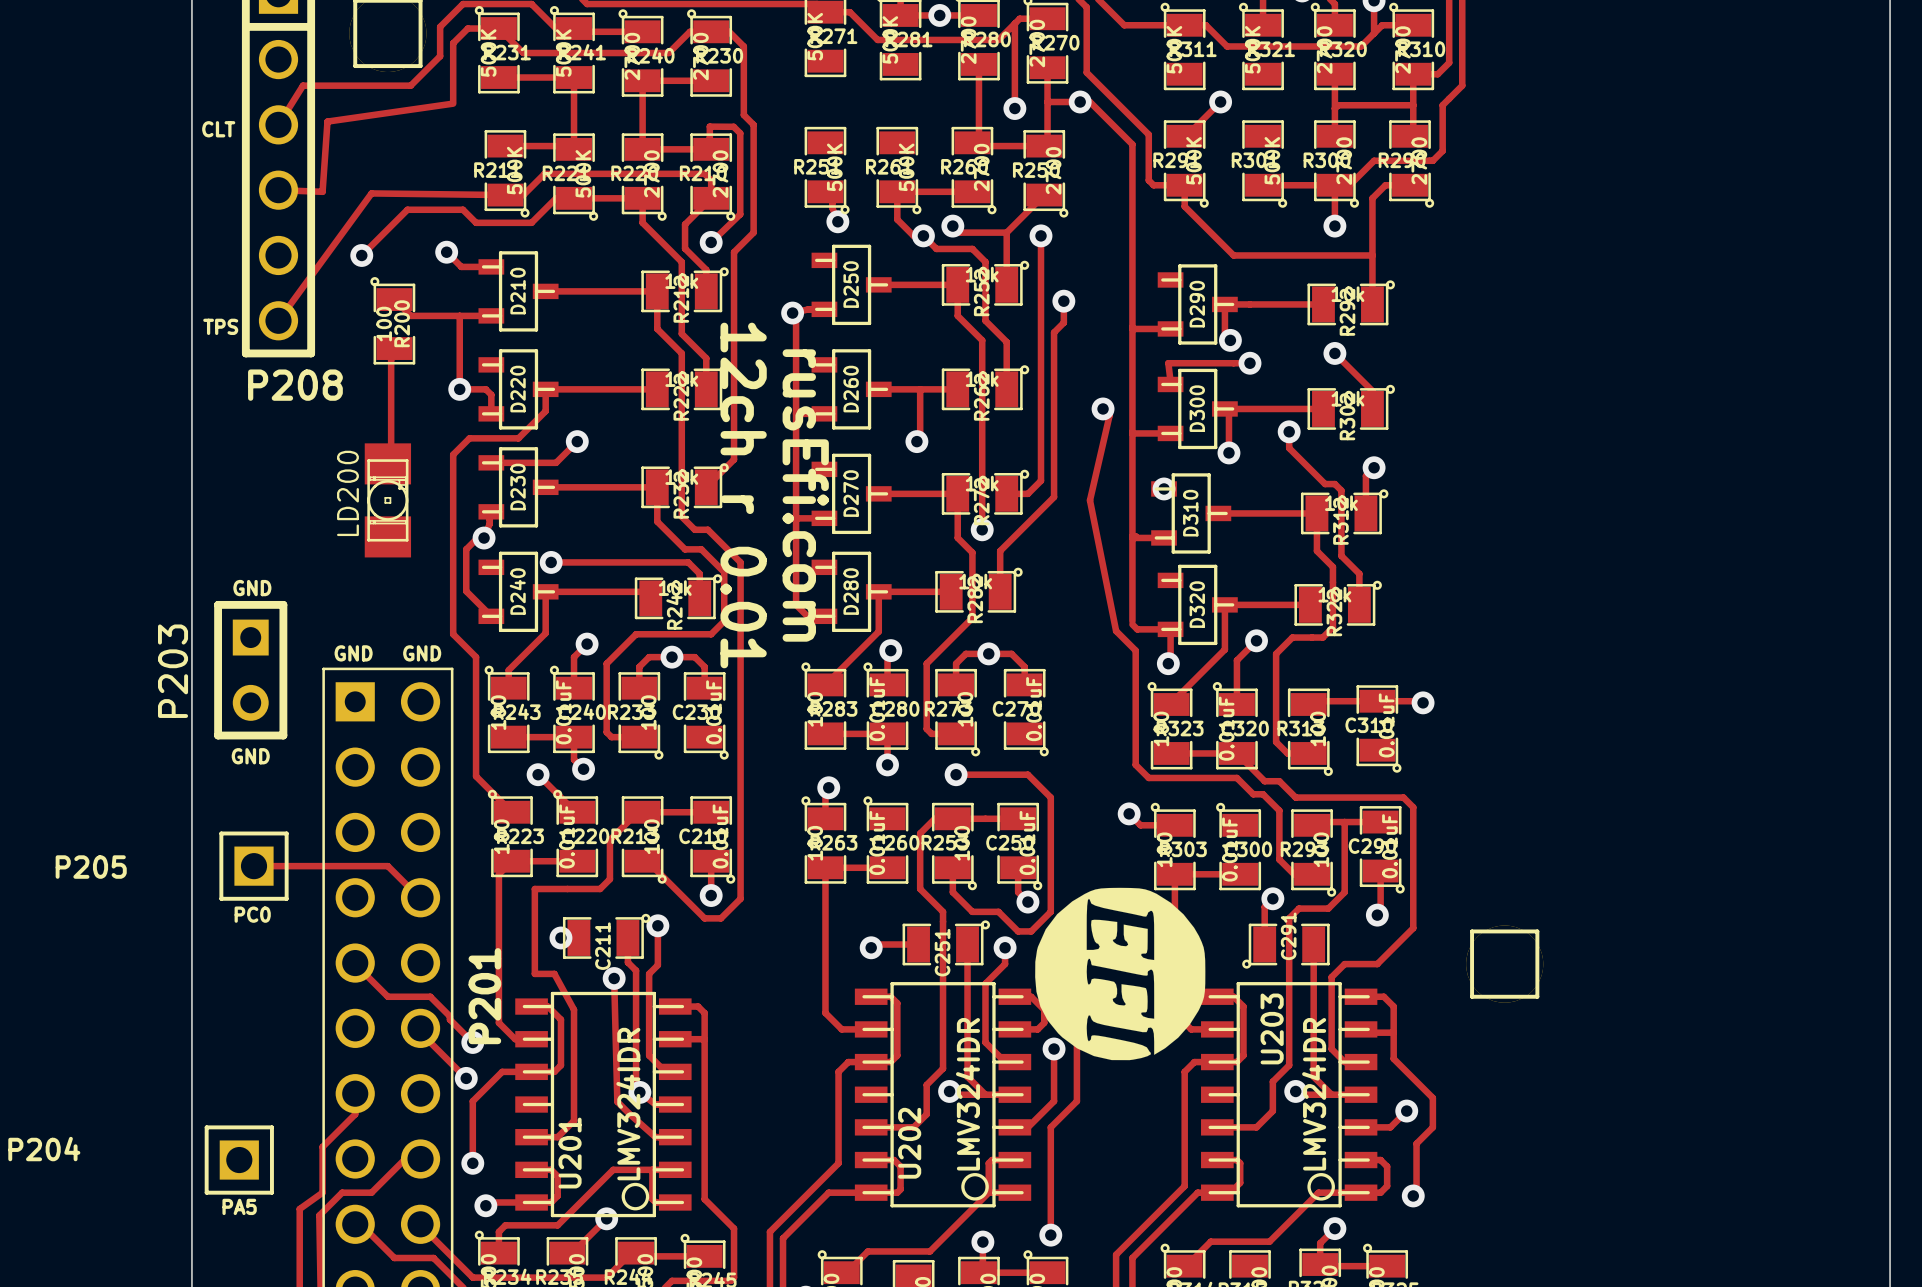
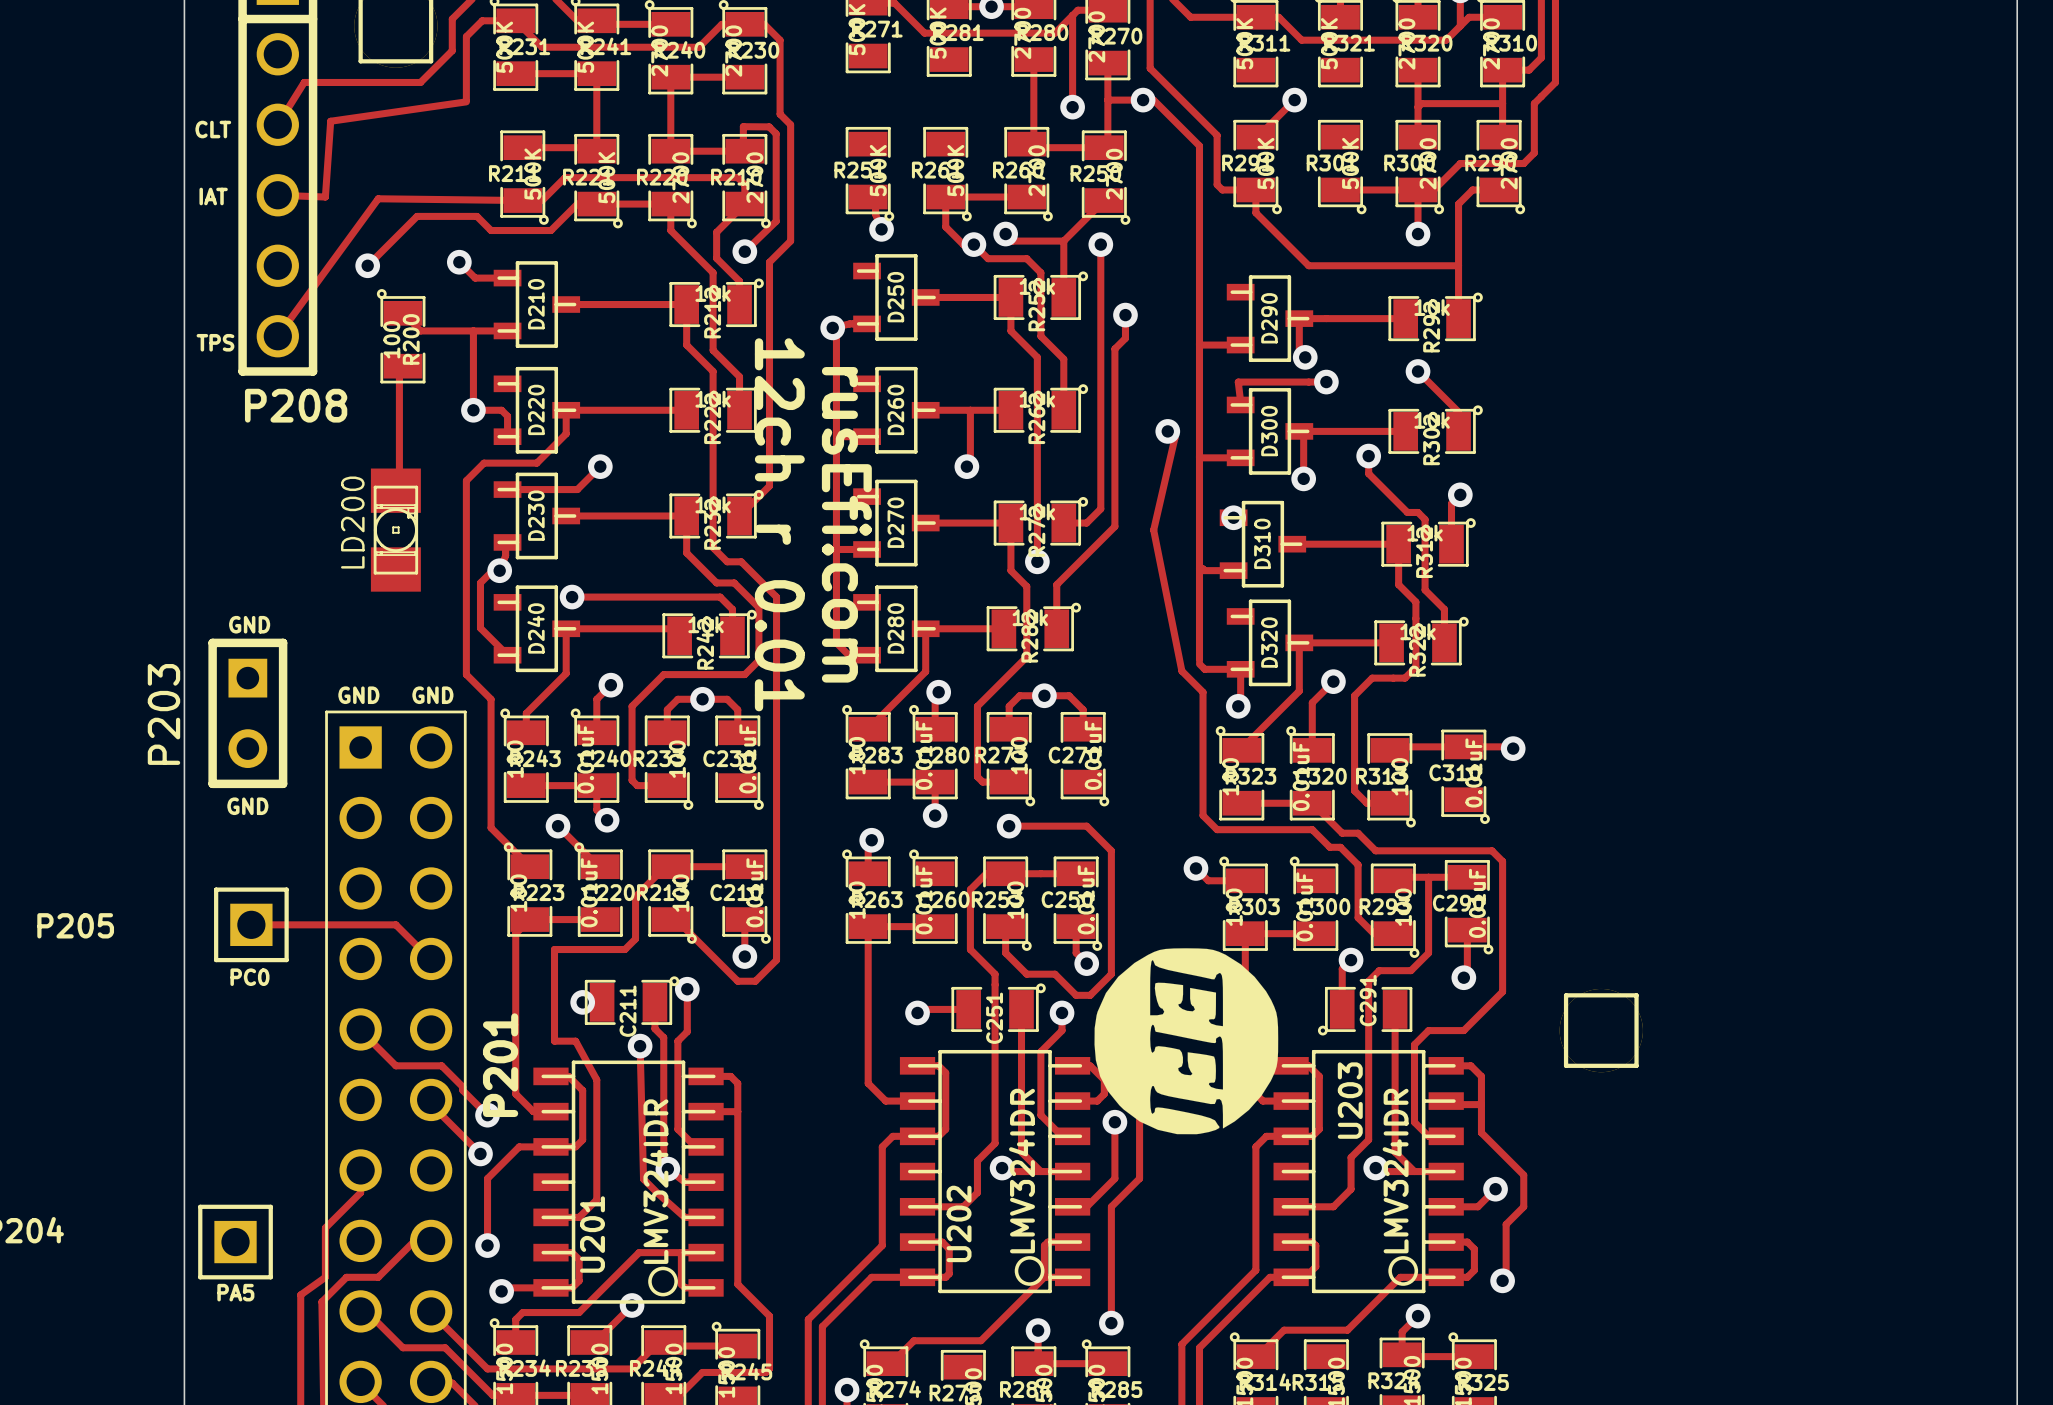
text: none -> IAT (213, 196)

